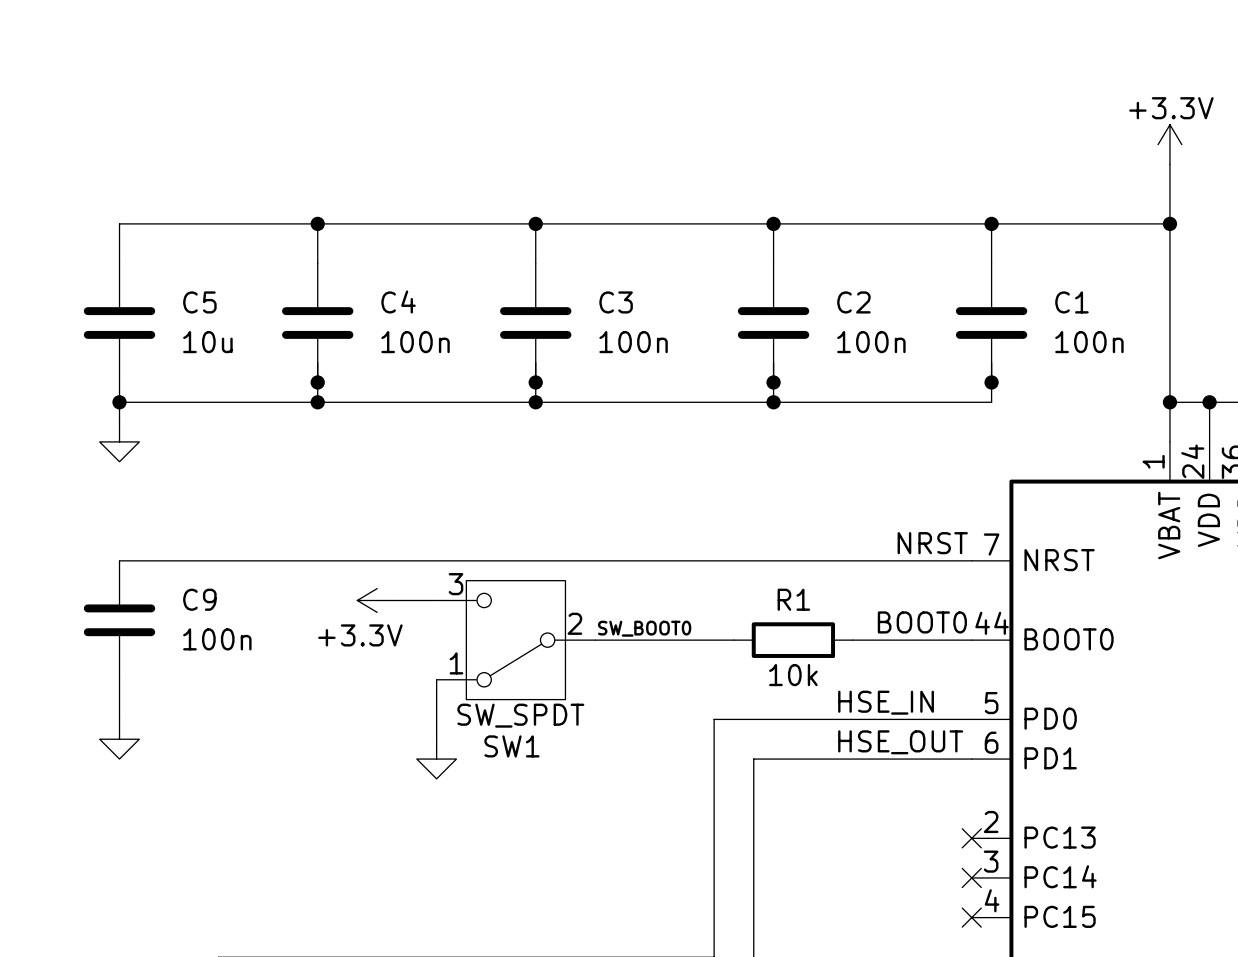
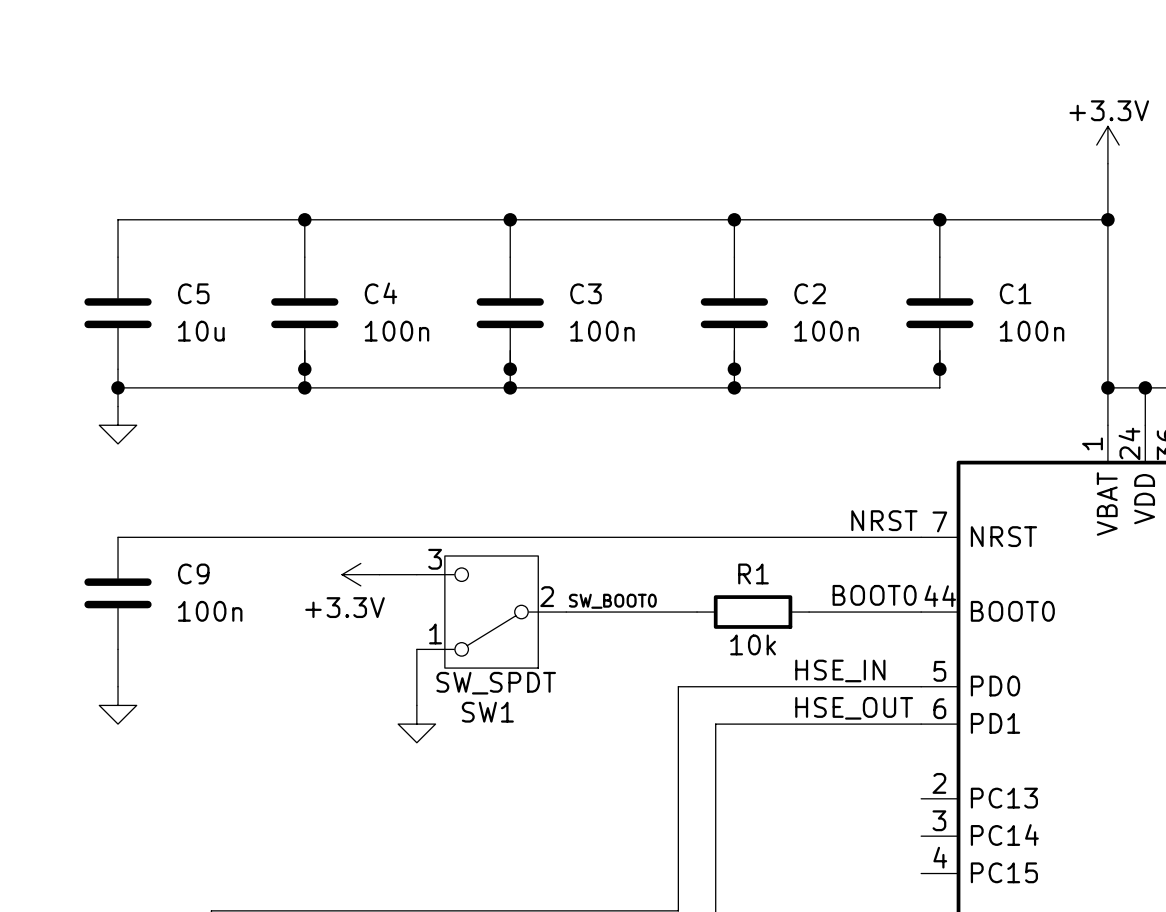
no-connect mark: (971, 838) -> none
no-connect mark: (971, 877) -> none
no-connect mark: (971, 917) -> none

